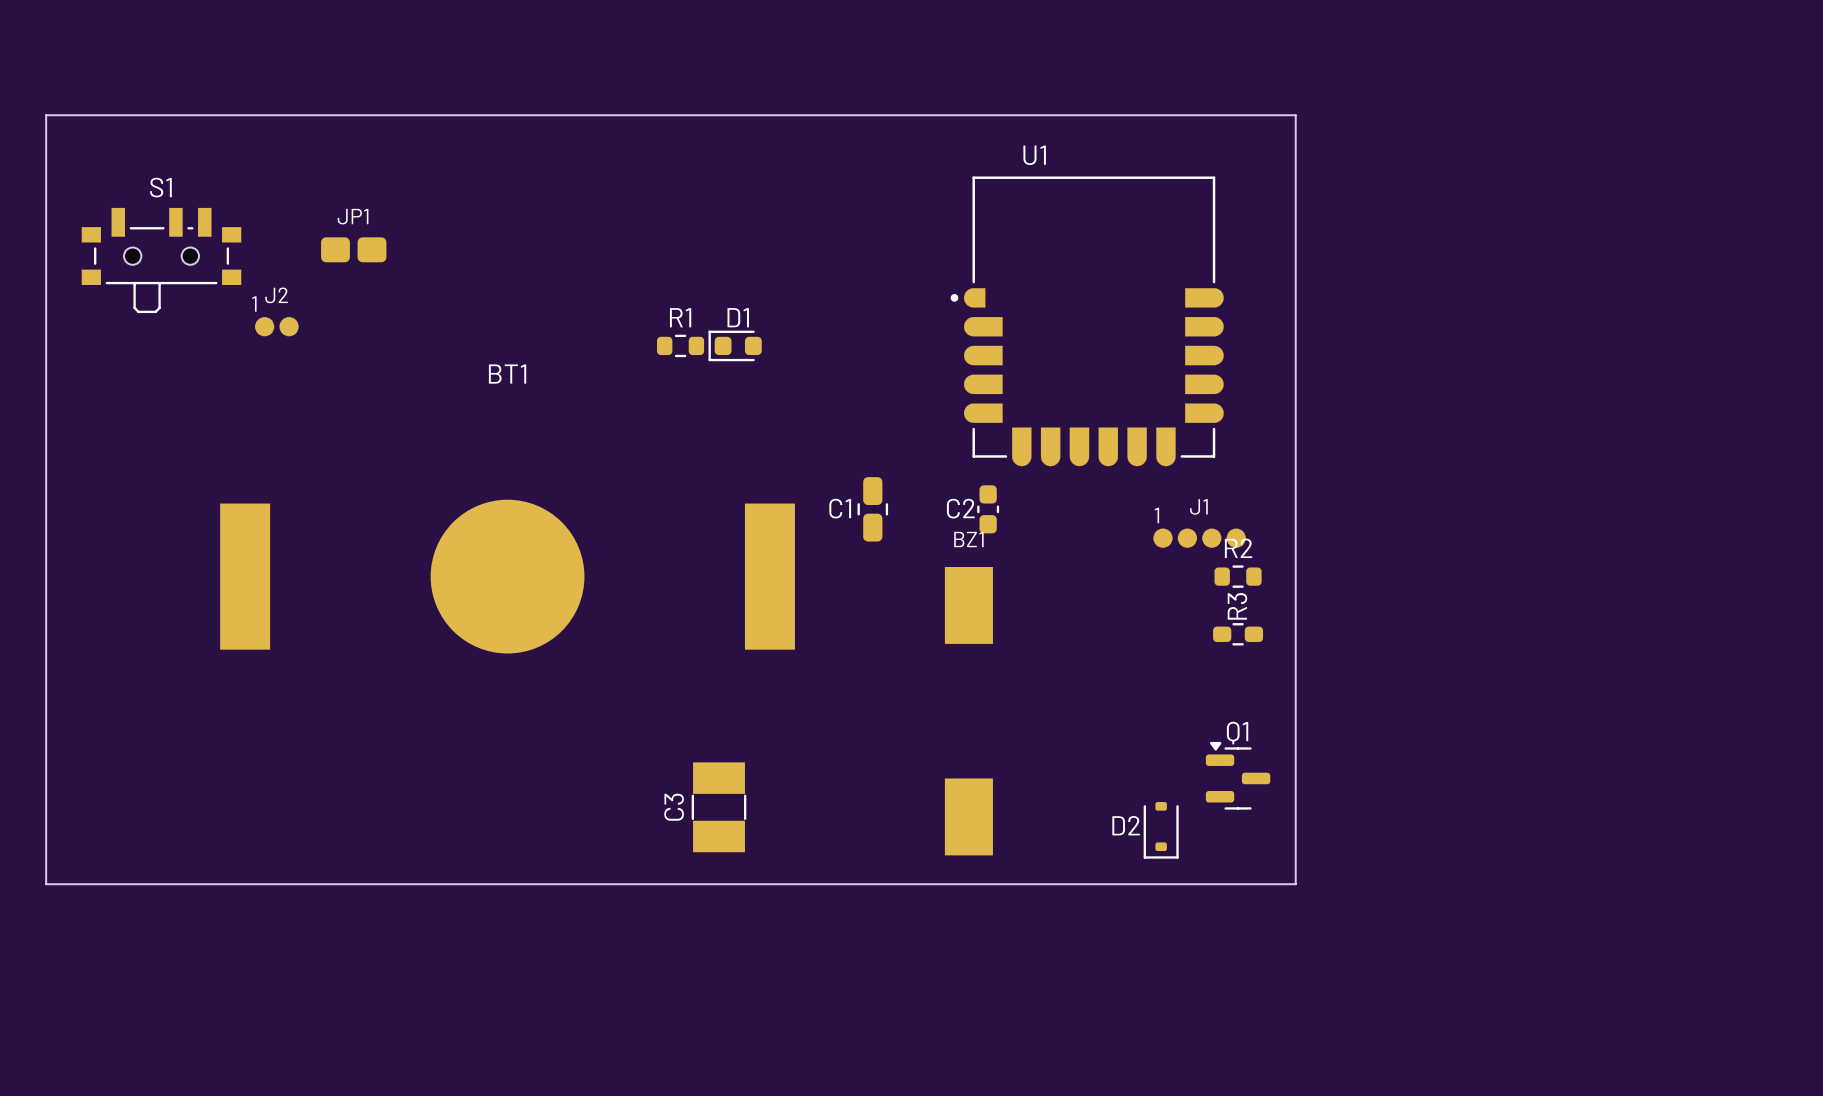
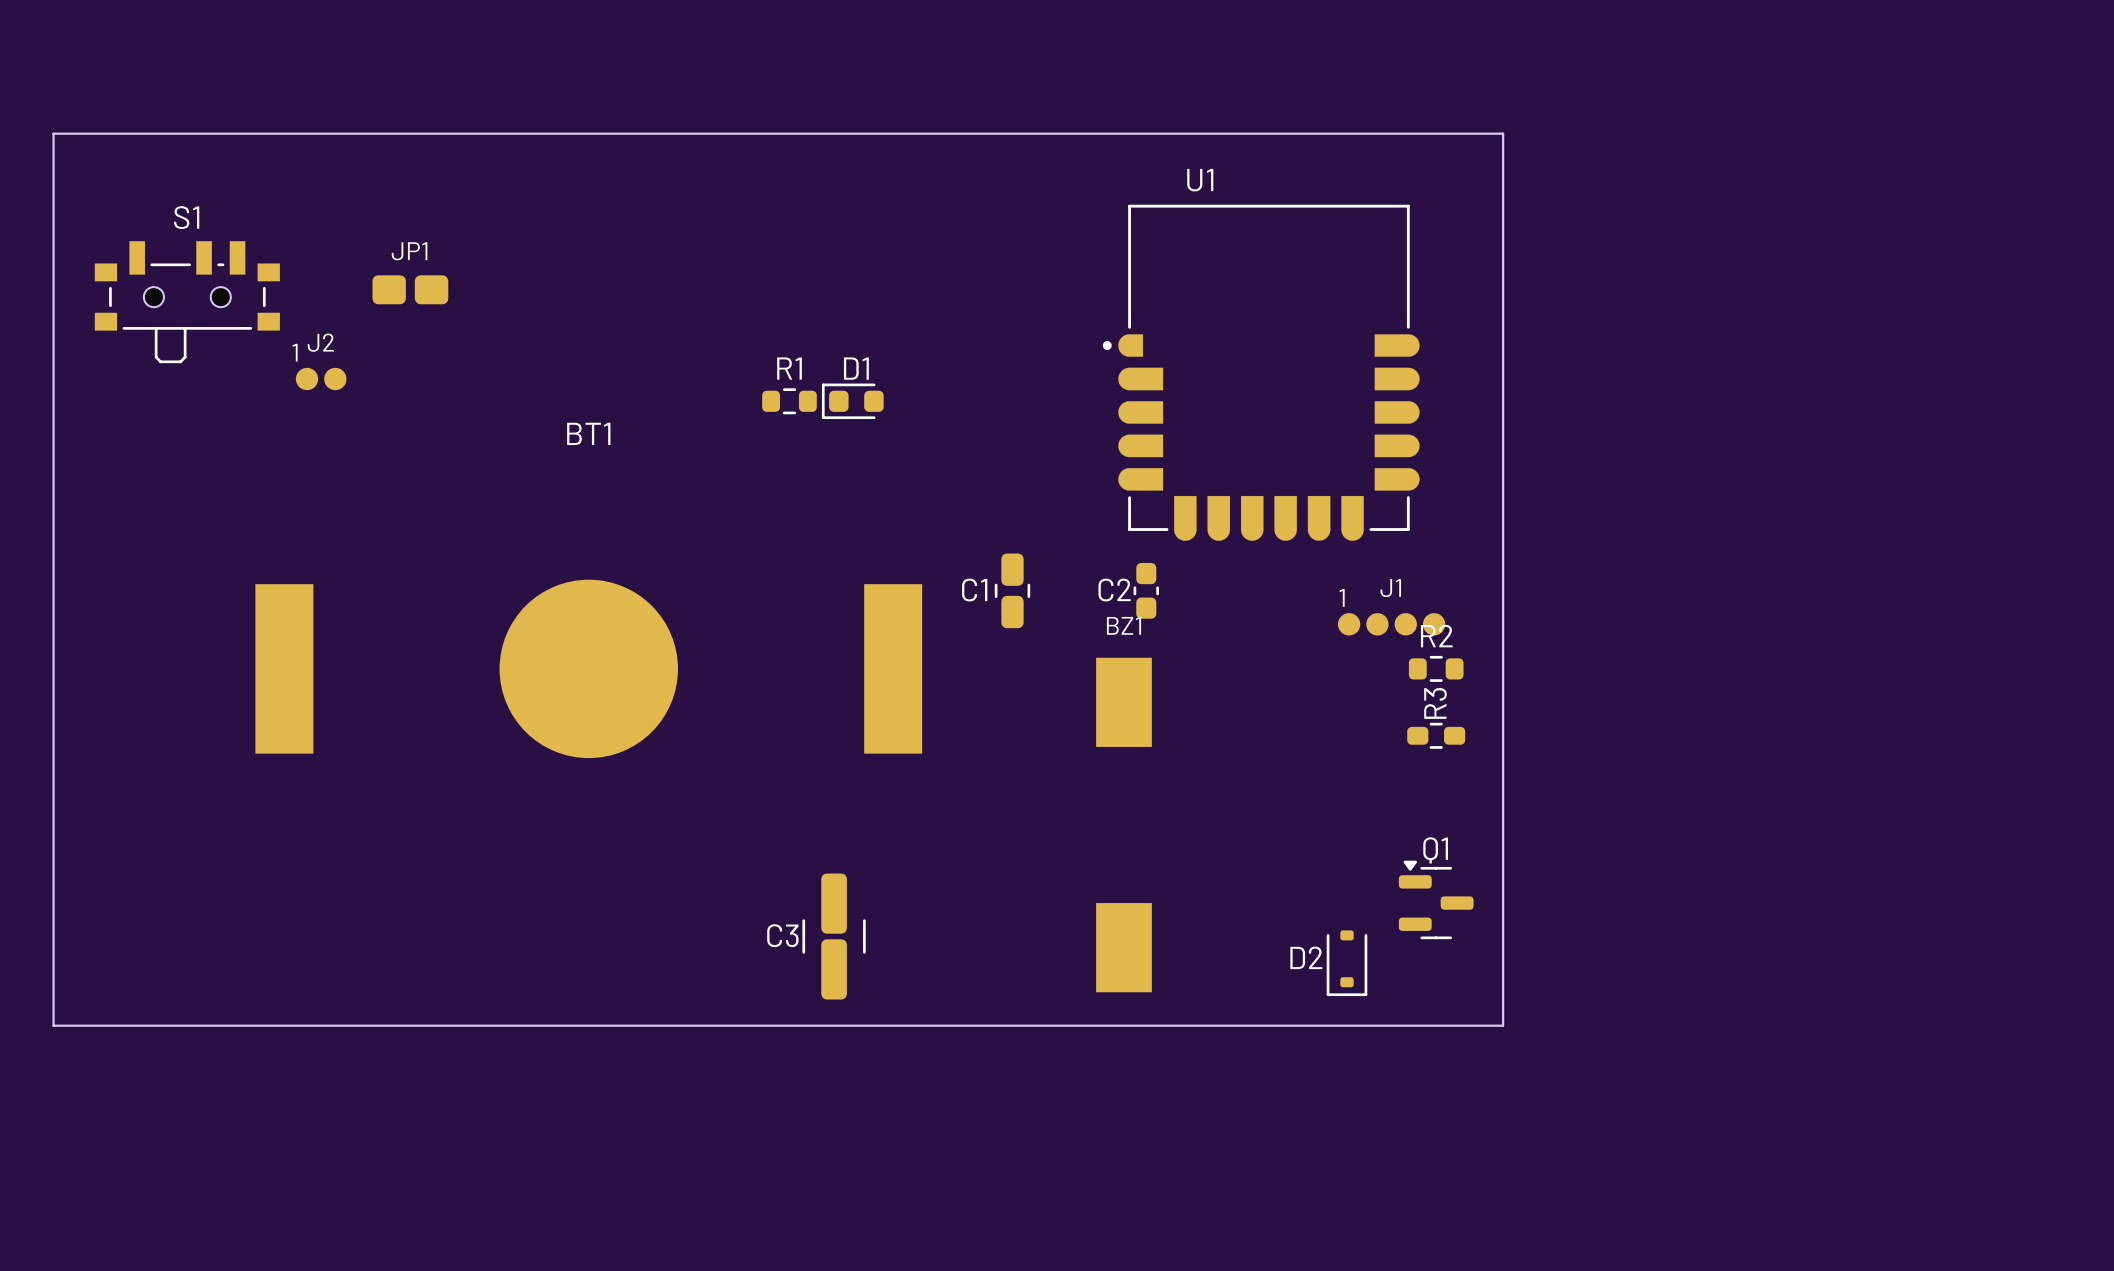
C3 footprint: [691, 762, 747, 853] -> [802, 873, 866, 1000]

